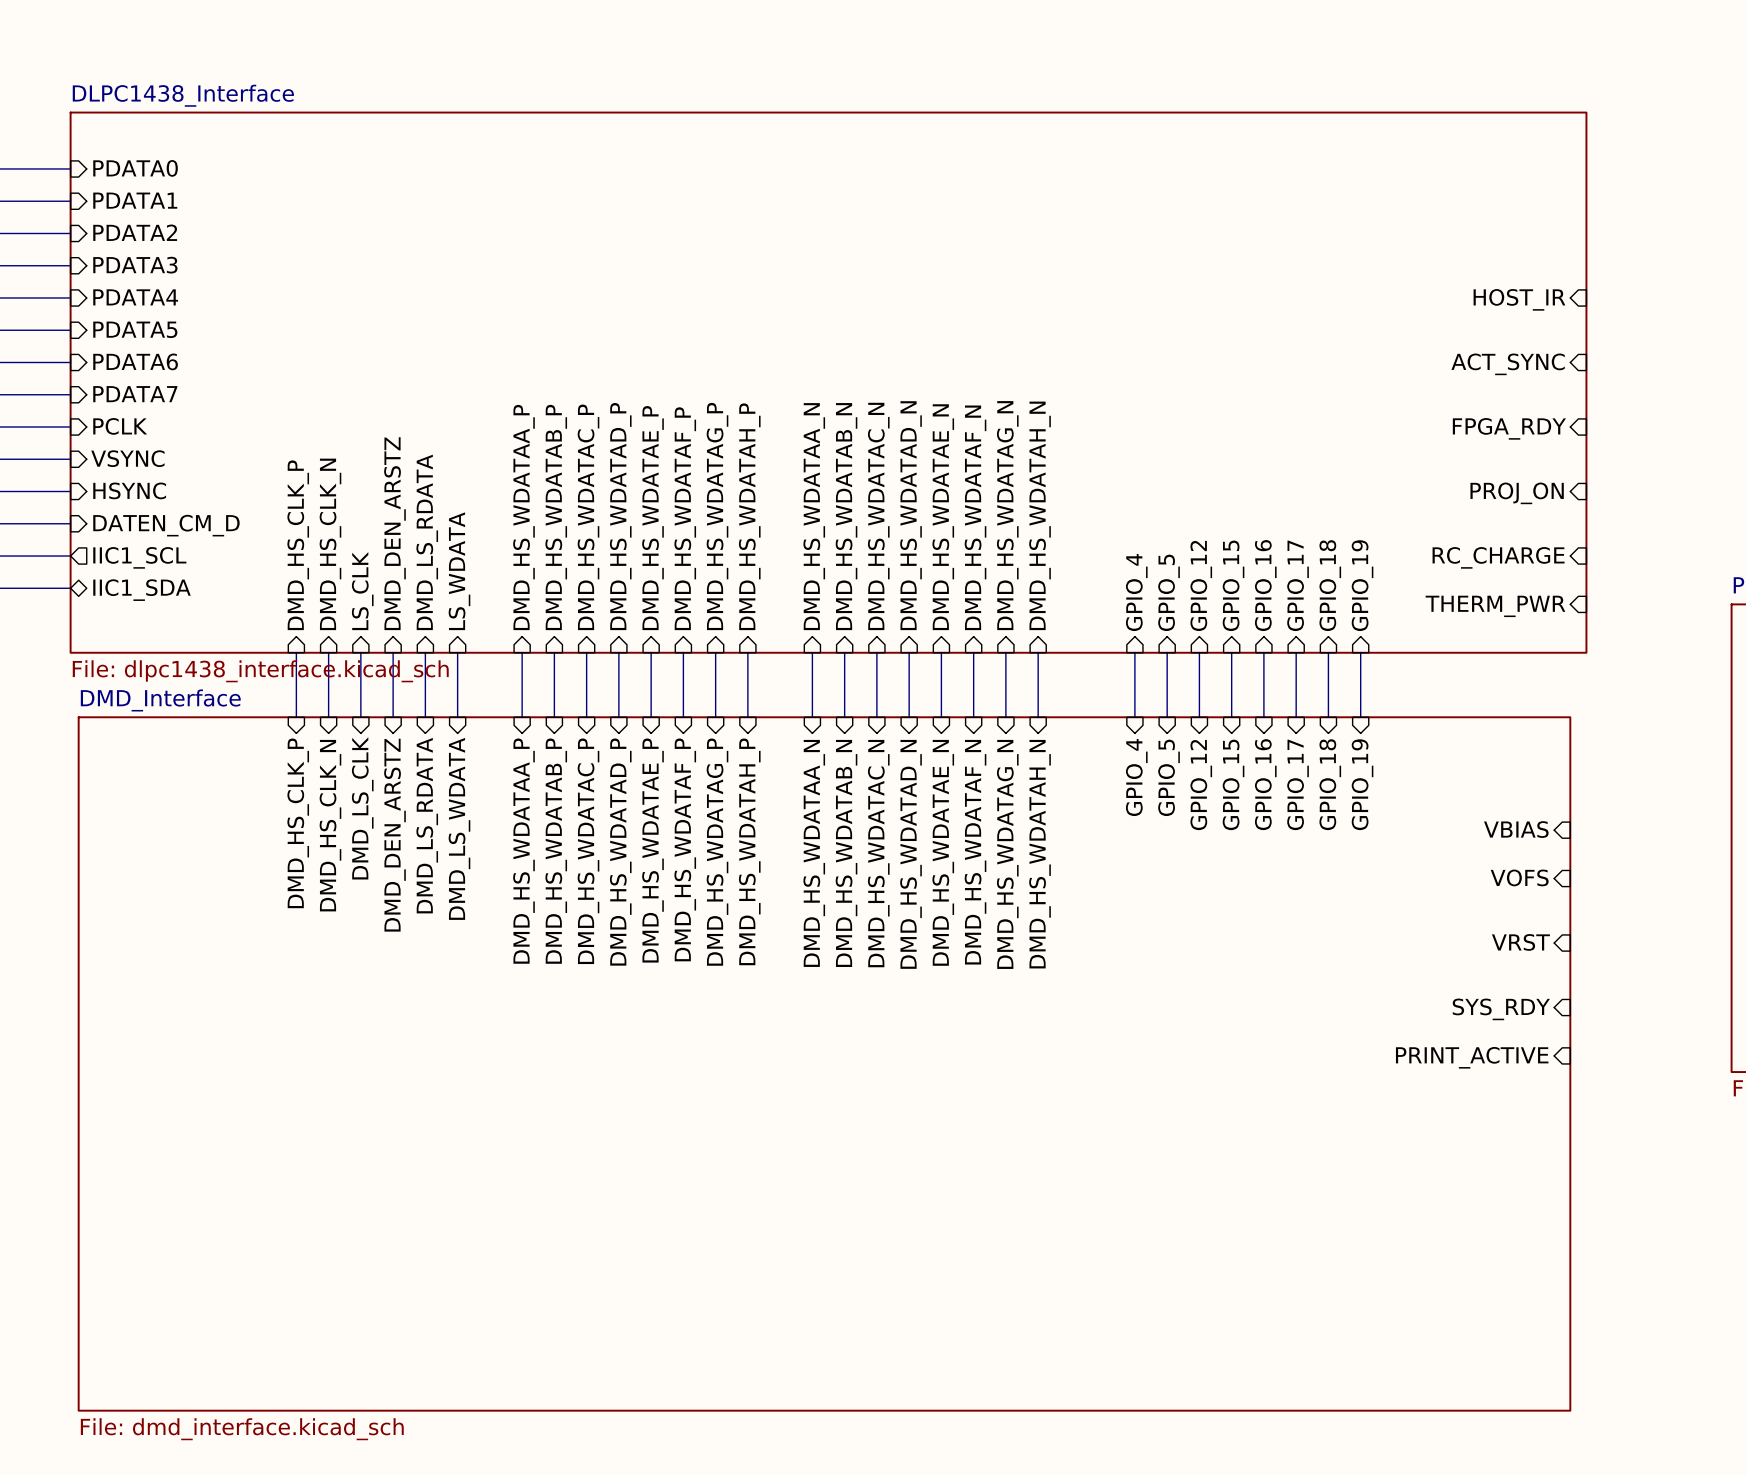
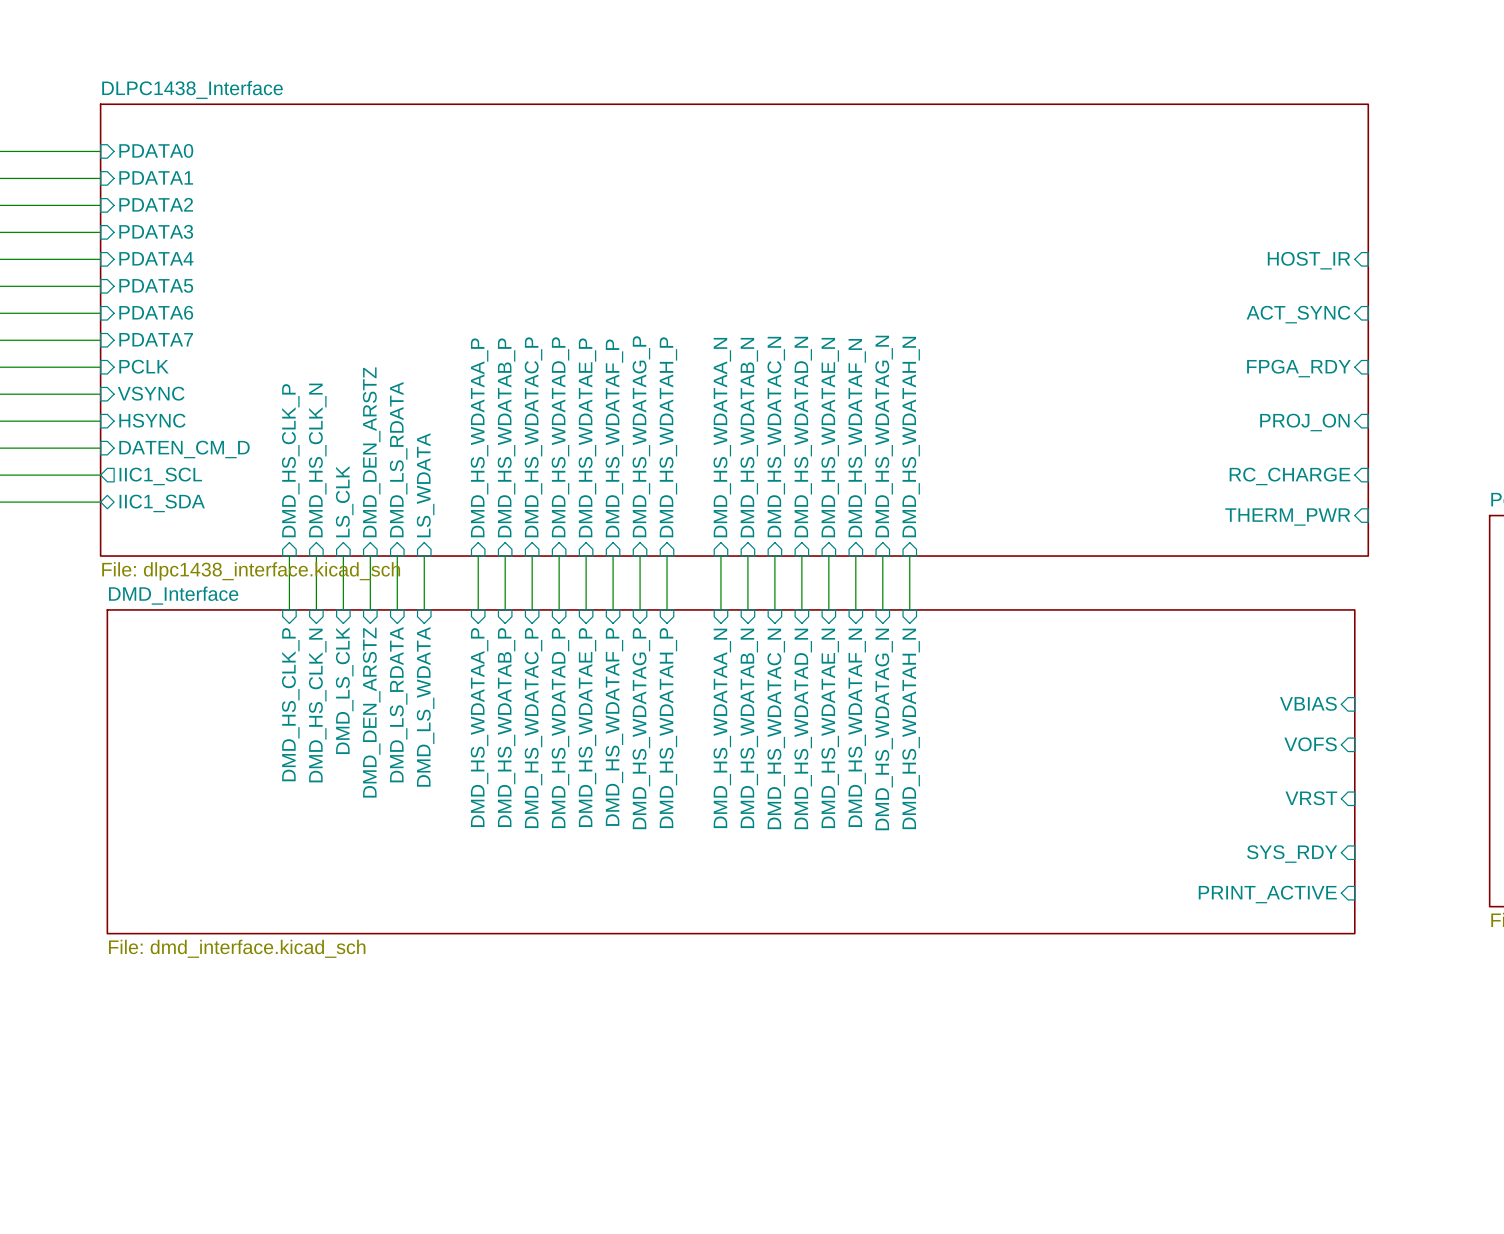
sheet pin: GPIO_12 (1201, 585) -> none
sheet pin: GPIO_15 (1233, 585) -> none
sheet pin: GPIO_16 (1265, 585) -> none
sheet pin: GPIO_17 (1298, 585) -> none
sheet pin: GPIO_18 (1330, 585) -> none
sheet pin: GPIO_19 (1362, 585) -> none
sheet pin: GPIO_4 (1136, 592) -> none
sheet pin: GPIO_5 (1169, 592) -> none
wire: (1134, 652) (1134, 717) -> none
wire: (1167, 652) (1167, 717) -> none
wire: (1199, 652) (1199, 717) -> none
wire: (1231, 652) (1231, 717) -> none
wire: (1263, 652) (1263, 717) -> none
wire: (1296, 652) (1296, 717) -> none
wire: (1328, 652) (1328, 717) -> none
wire: (1360, 652) (1360, 717) -> none
sheet pin: GPIO_4 (1136, 777) -> none
sheet pin: GPIO_5 (1169, 777) -> none
sheet pin: GPIO_15 (1233, 784) -> none
sheet pin: GPIO_16 (1265, 784) -> none
sheet pin: GPIO_17 (1298, 784) -> none
sheet pin: GPIO_18 (1330, 784) -> none
sheet pin: GPIO_19 (1362, 784) -> none
sheet pin: GPIO_12 (1201, 785) -> none
sheet DMD_Interface: none -> File: dmd_interface.kicad_sch (731, 771)
sheet DMD_Interface: File: dmd_interface.kicad_sch (824, 1063) -> none

